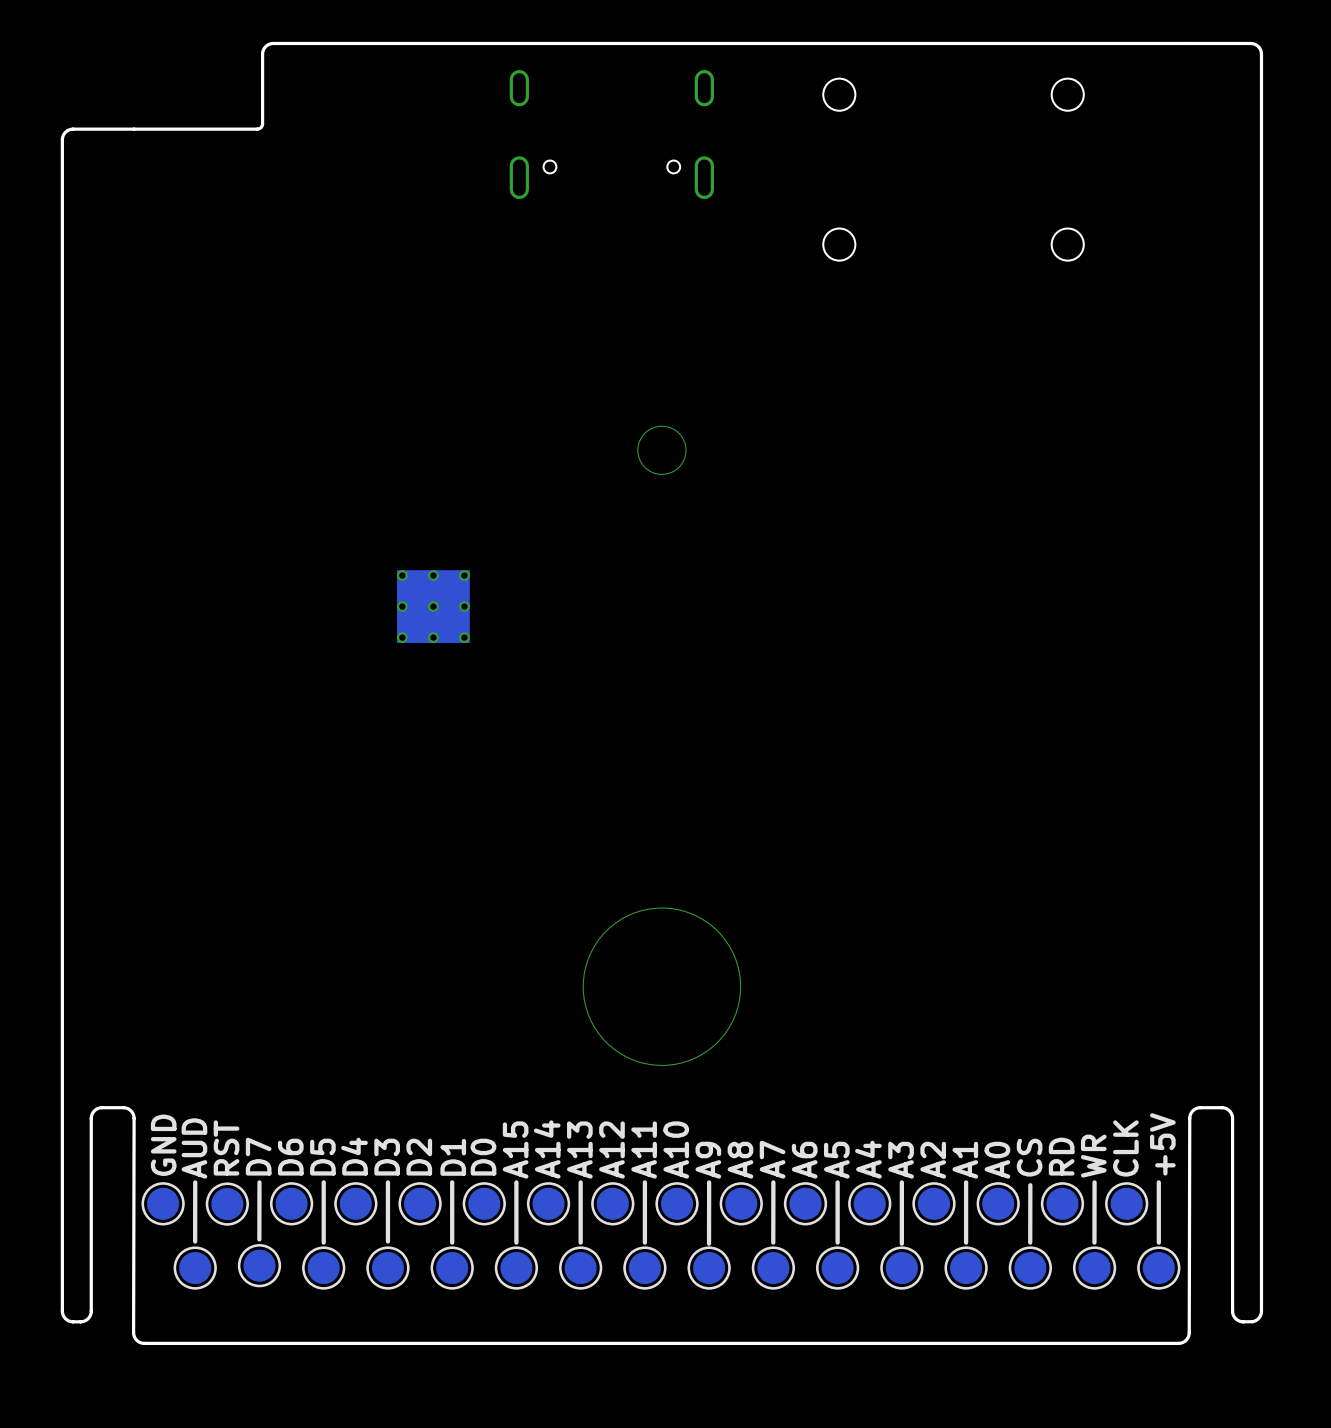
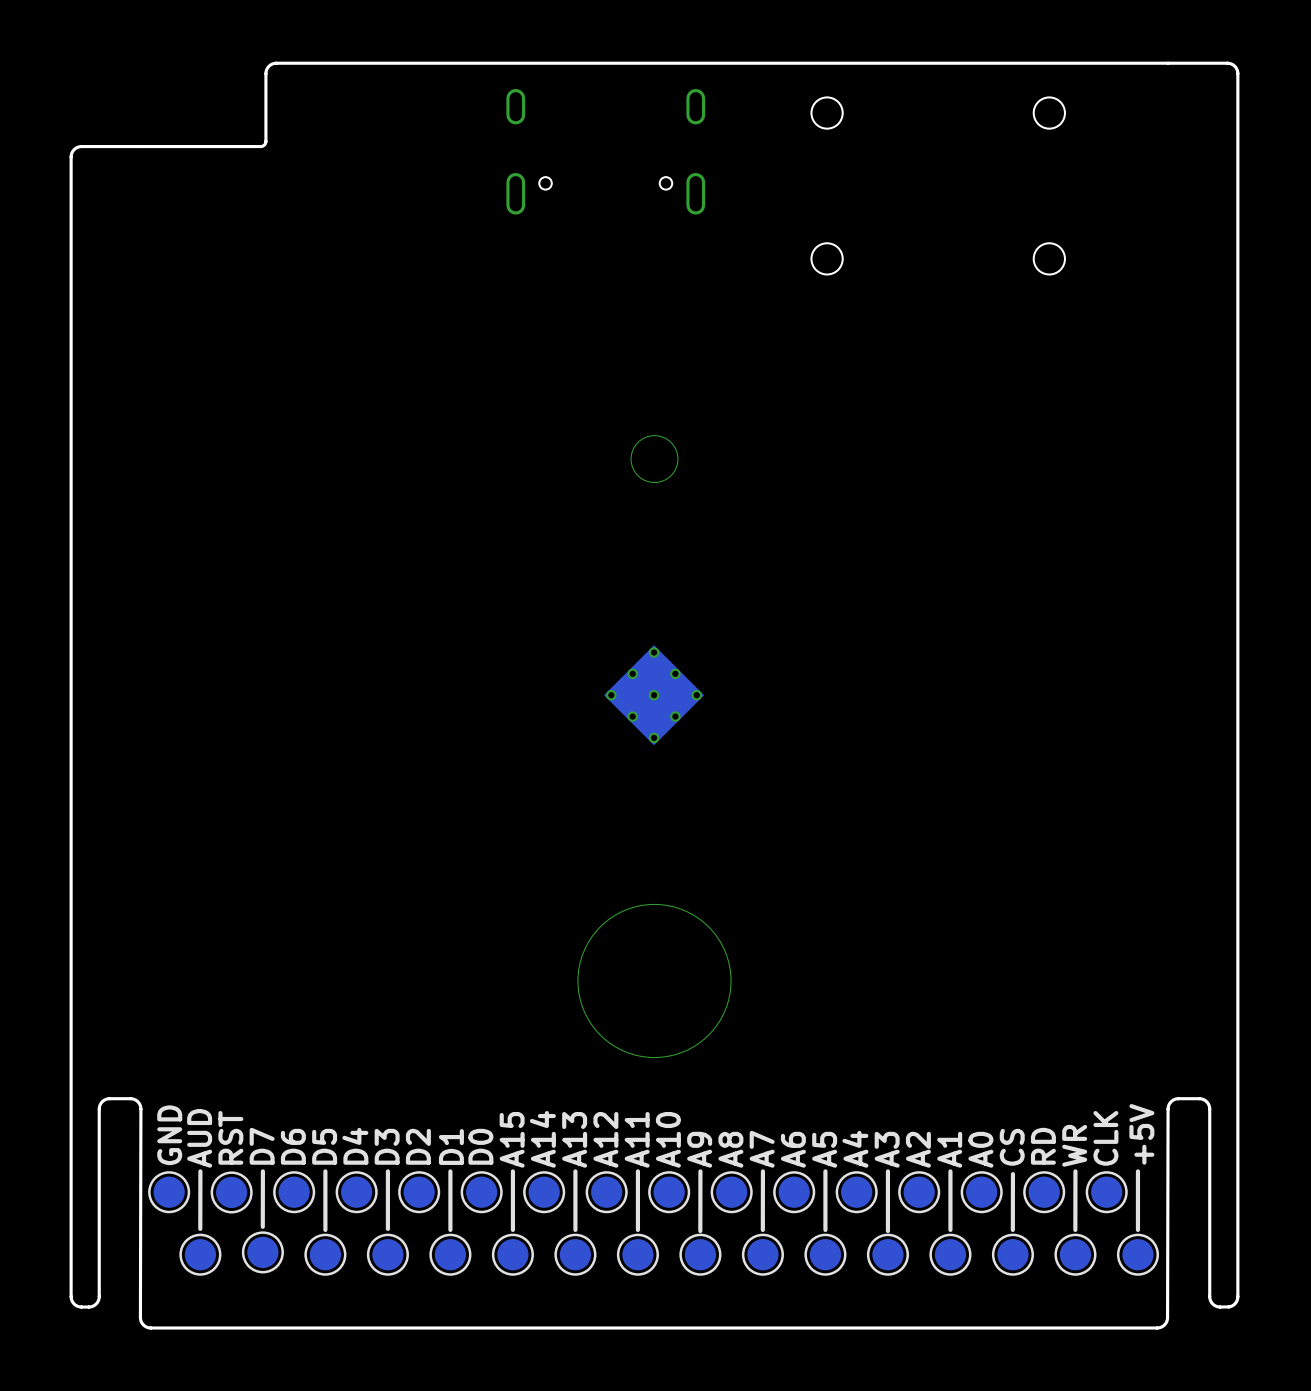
part: (433, 606) -> none
part: none -> (654, 695)

